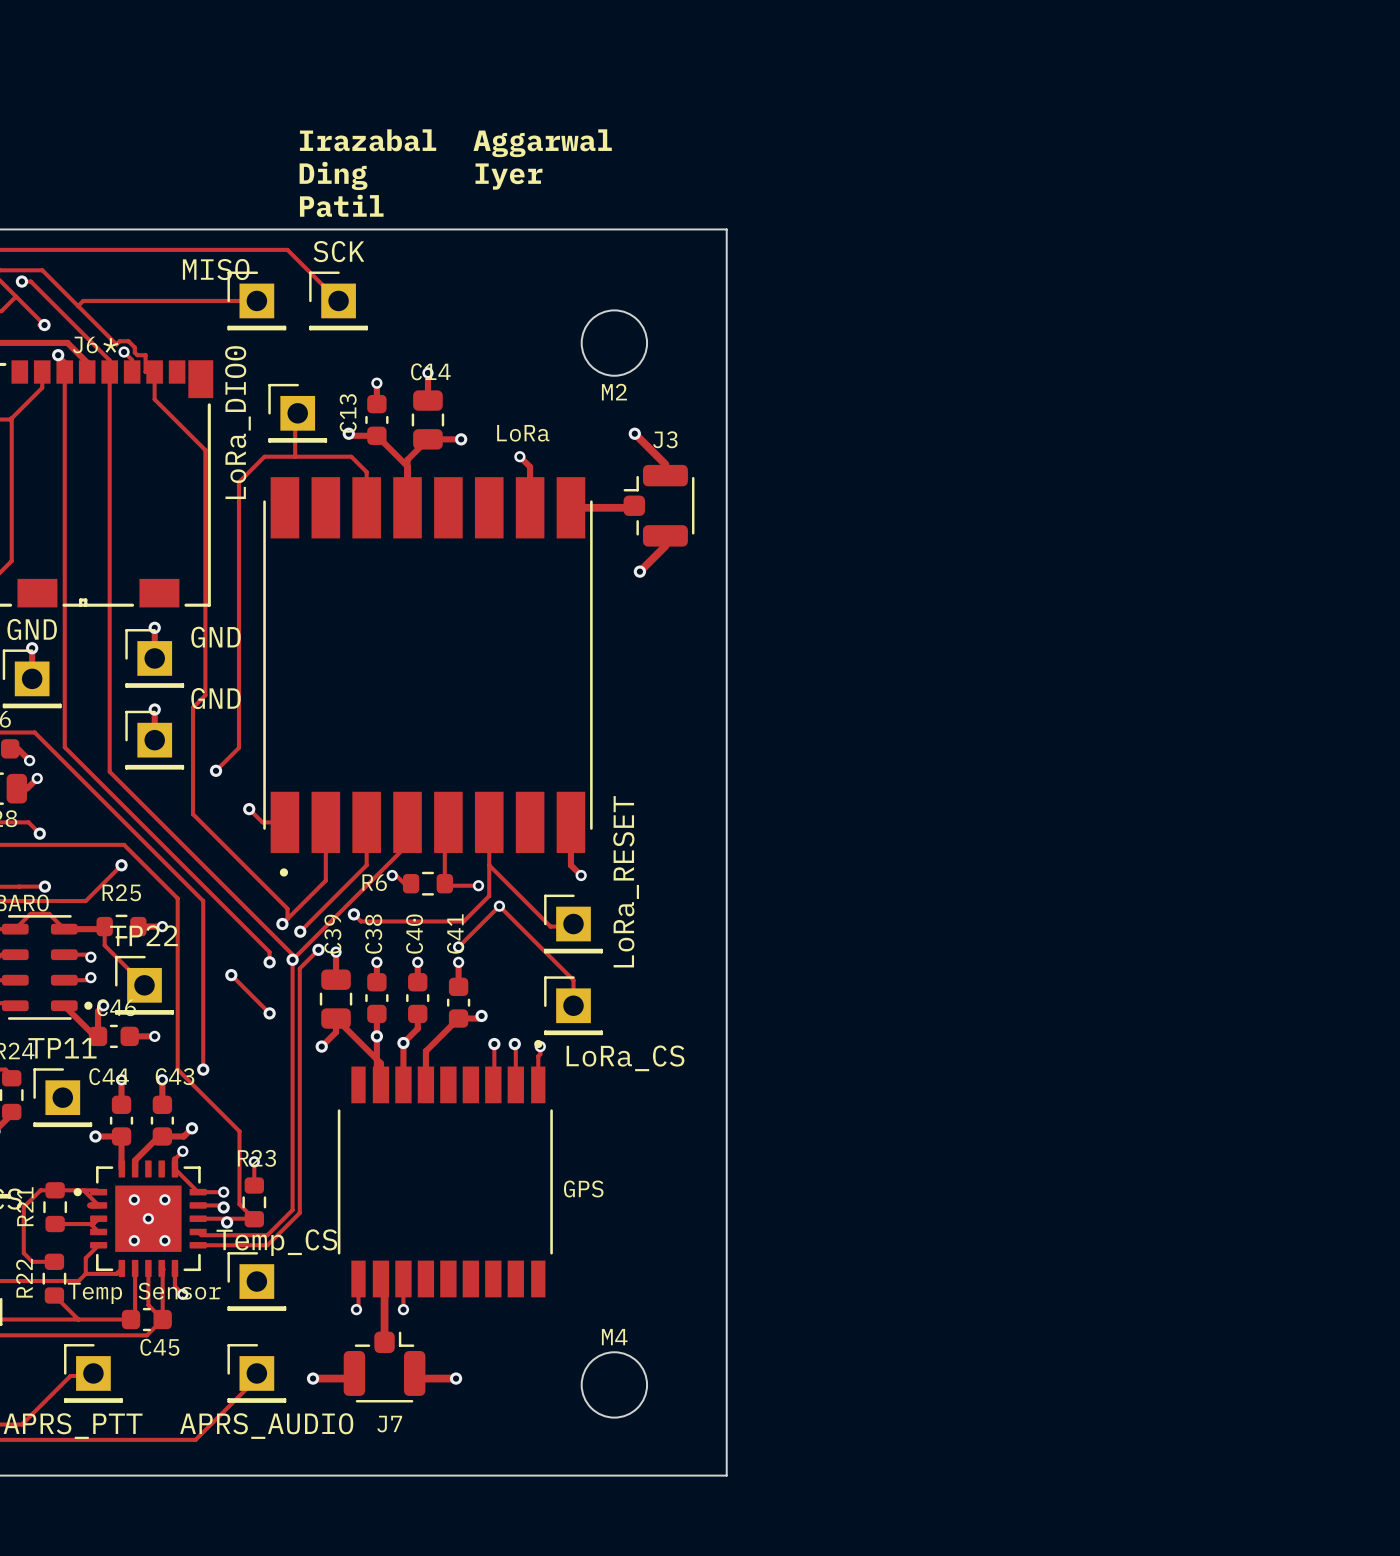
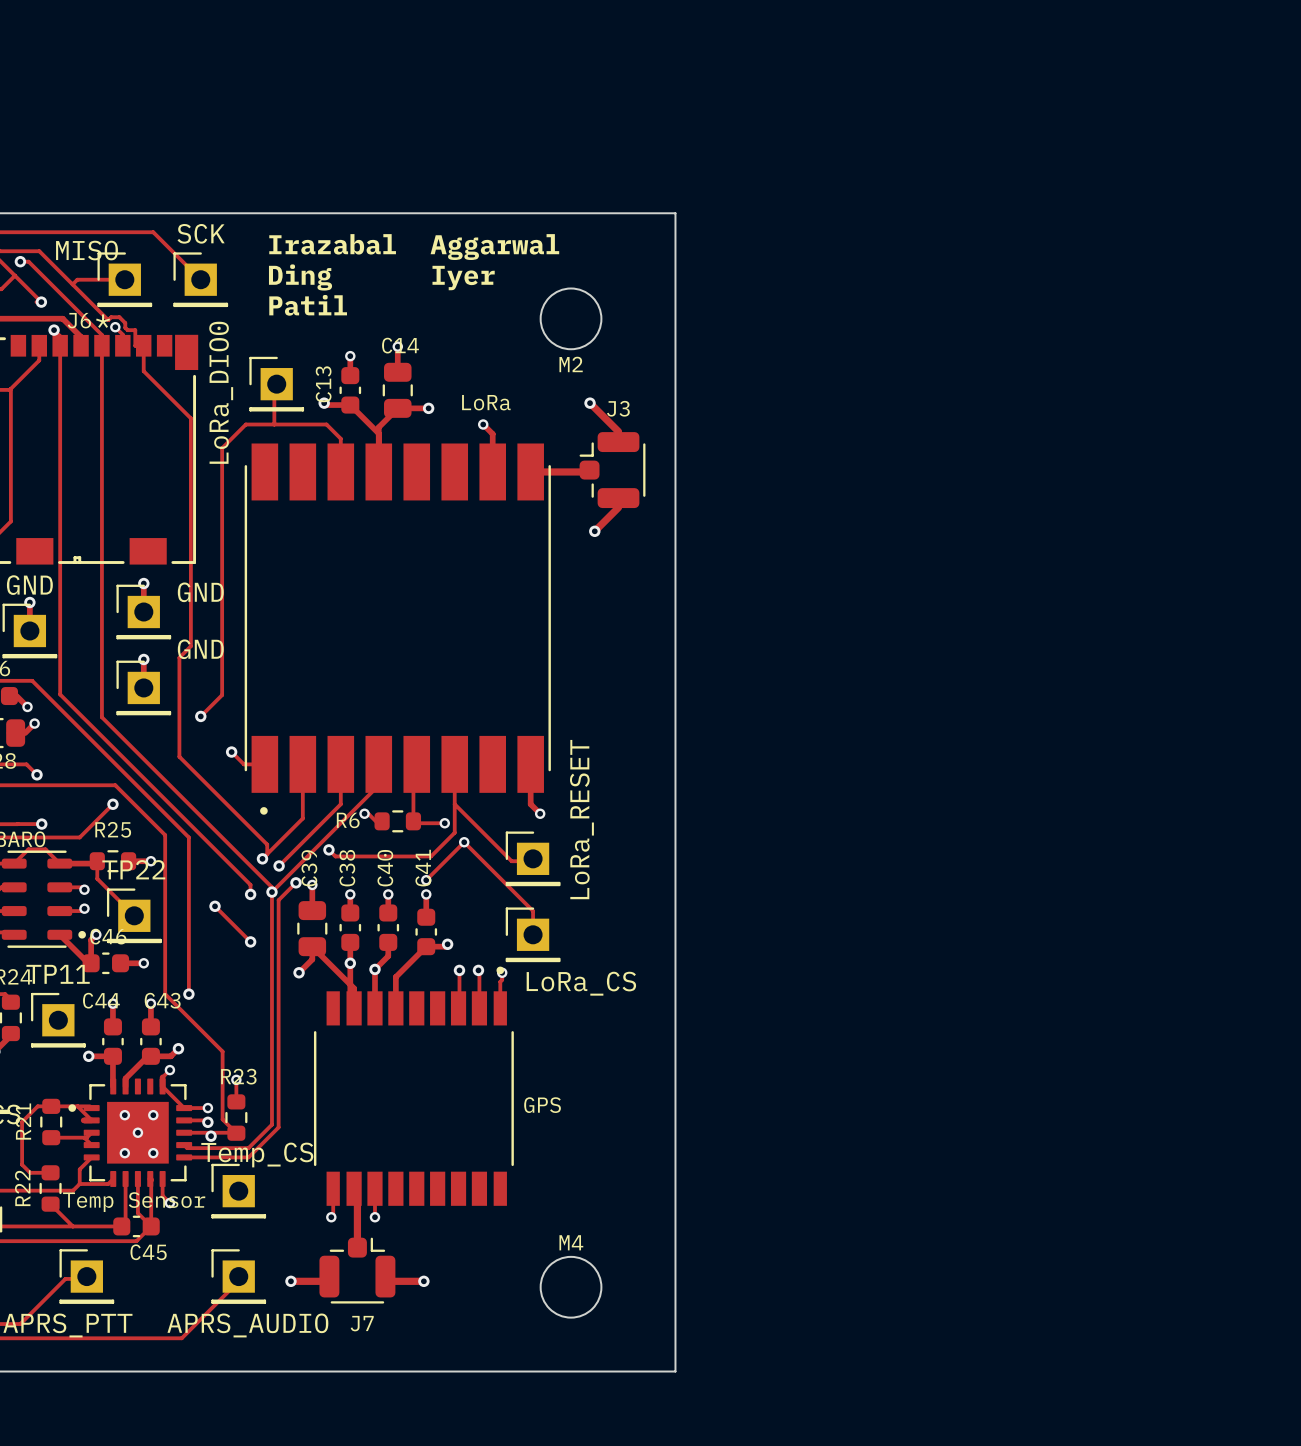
text position: Irazabal Aggarwal (455, 143) -> Irazabal Aggarwal (414, 247)
text position: Ding Iyer (421, 175) -> Ding Iyer (381, 277)
text position: Patil (341, 205) -> Patil (308, 305)
track: (164, 249) (287, 249) (338, 300) -> (153, 232) (200, 279)
track: (134, 300) (256, 300) -> none
MISO position: (256, 300) -> (124, 279)
SCK position: (338, 300) -> (200, 279)

